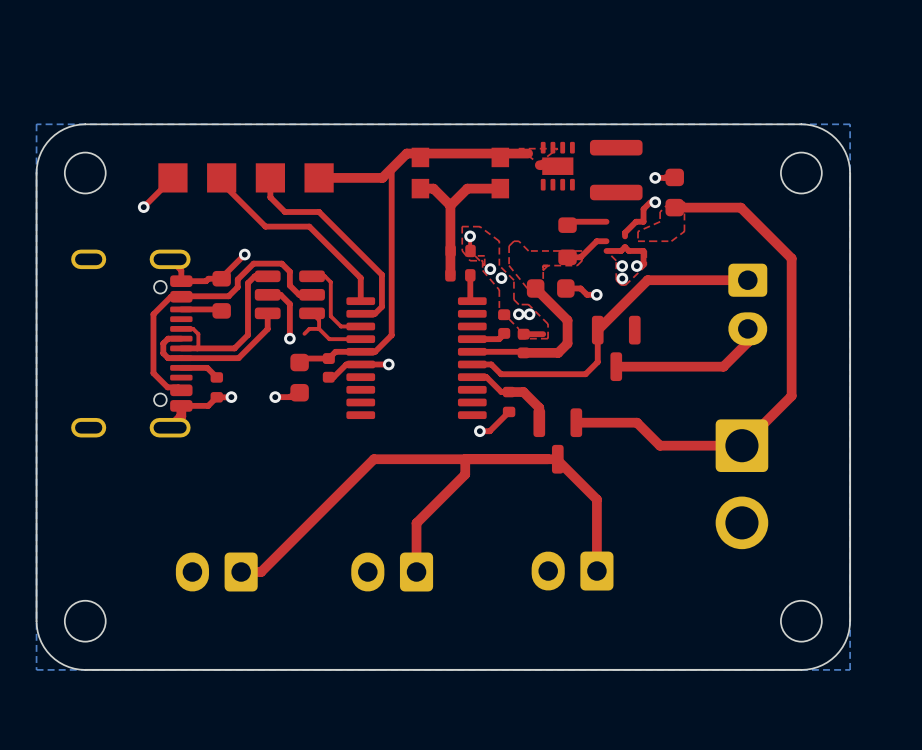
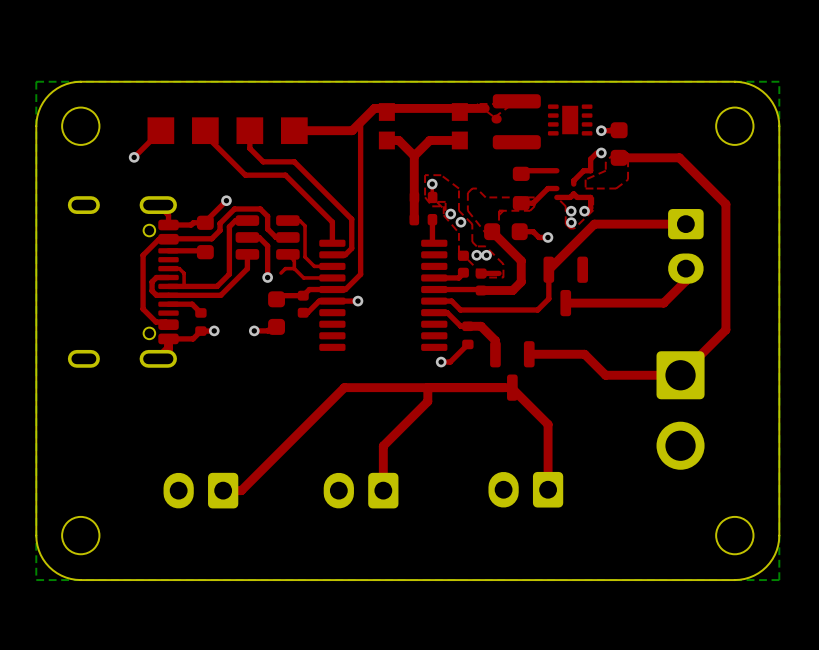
part footprint: [589, 139, 643, 201] -> [547, 104, 593, 136]
part footprint: [540, 141, 575, 191] -> [492, 94, 541, 150]

